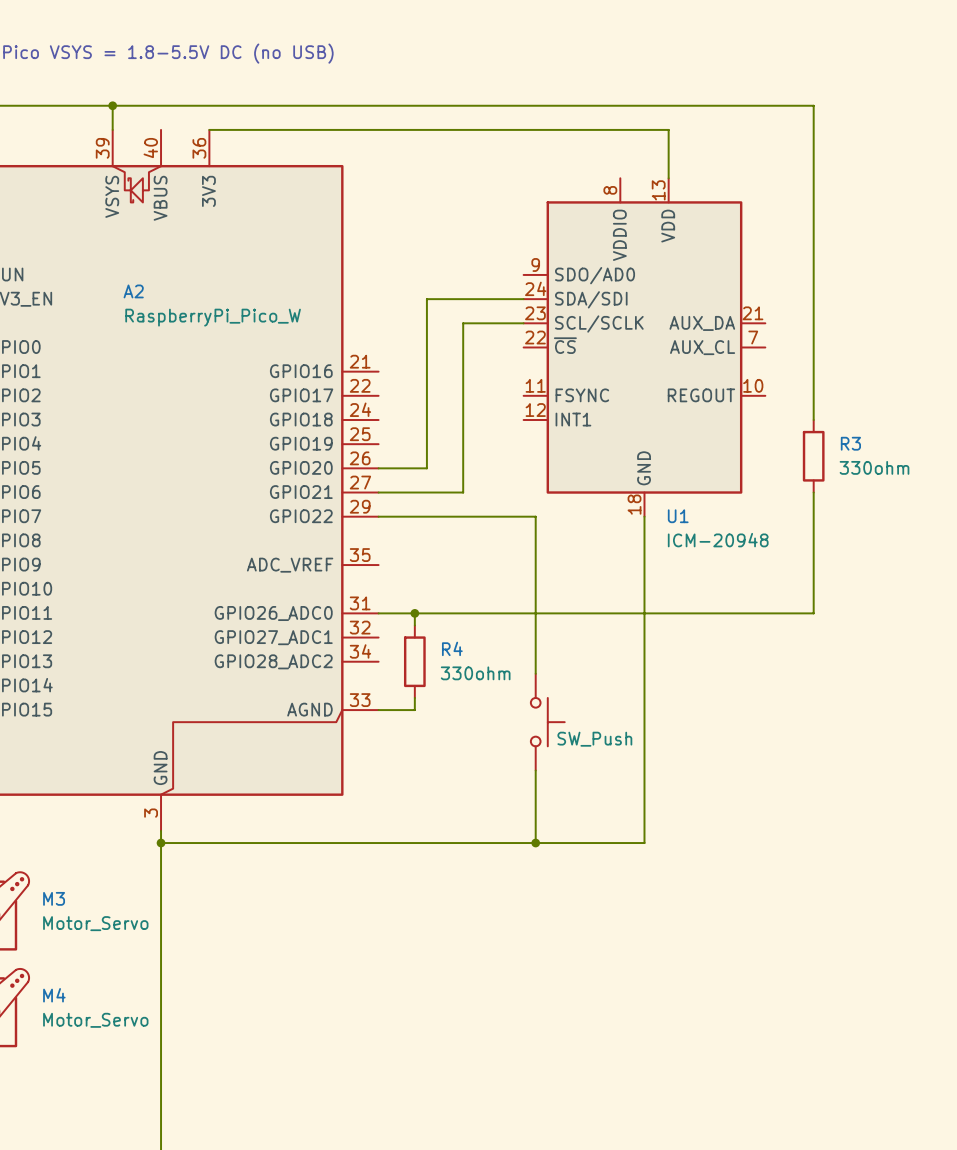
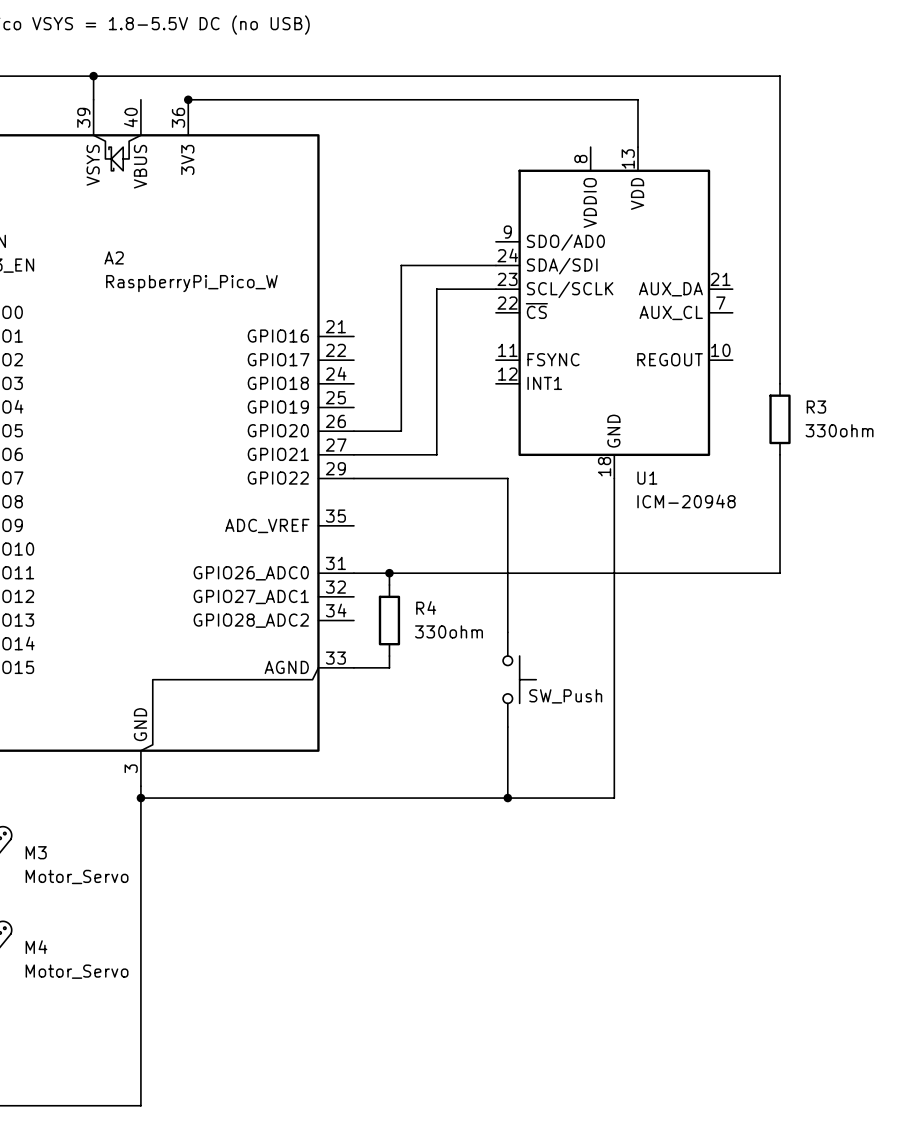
junction: none -> (188, 99)

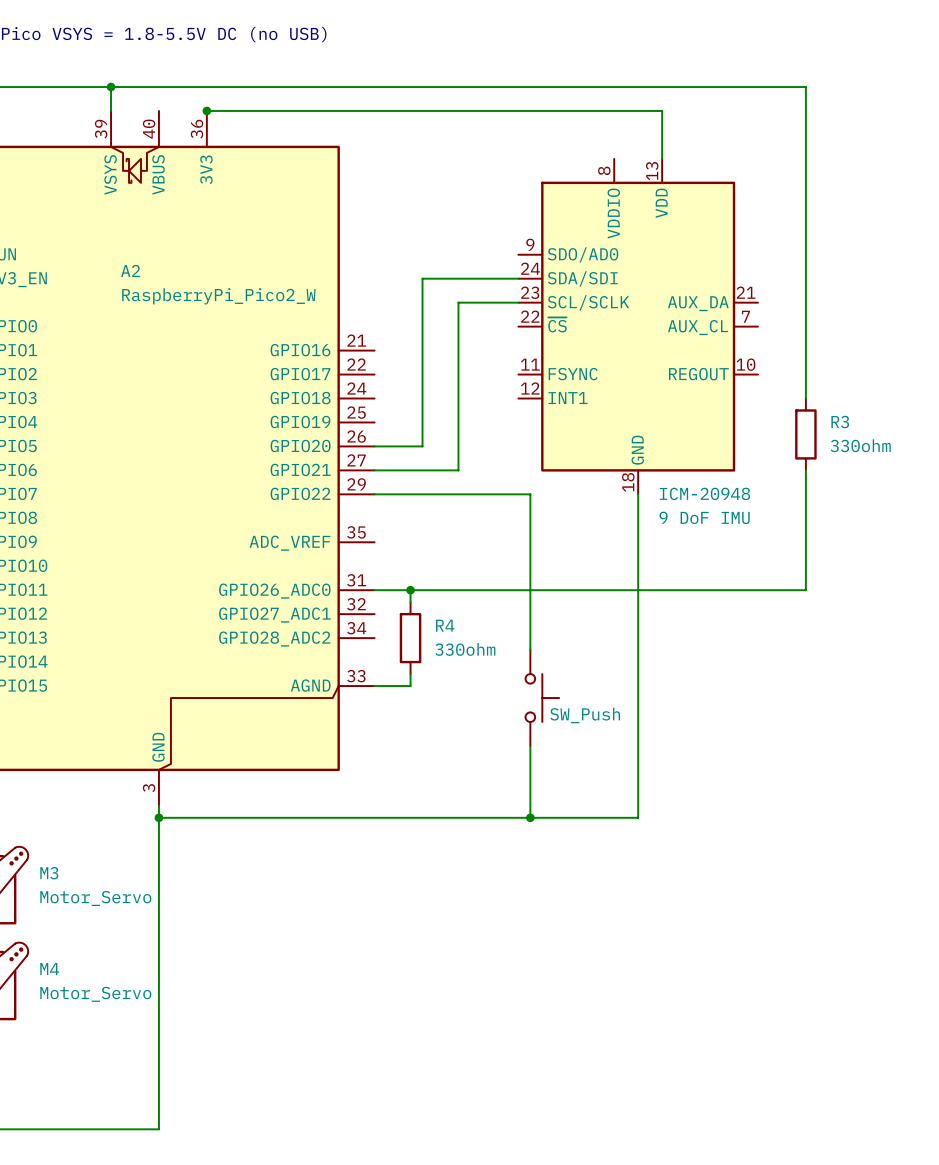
A2 value: RaspberryPi_Pico_W (191, 283) -> RaspberryPi_Pico2_W (218, 296)
U1 name: U1 (647, 478) -> ICM-20948 (704, 493)
U1 value: ICM-20948 (686, 501) -> 9 DoF IMU (704, 517)

